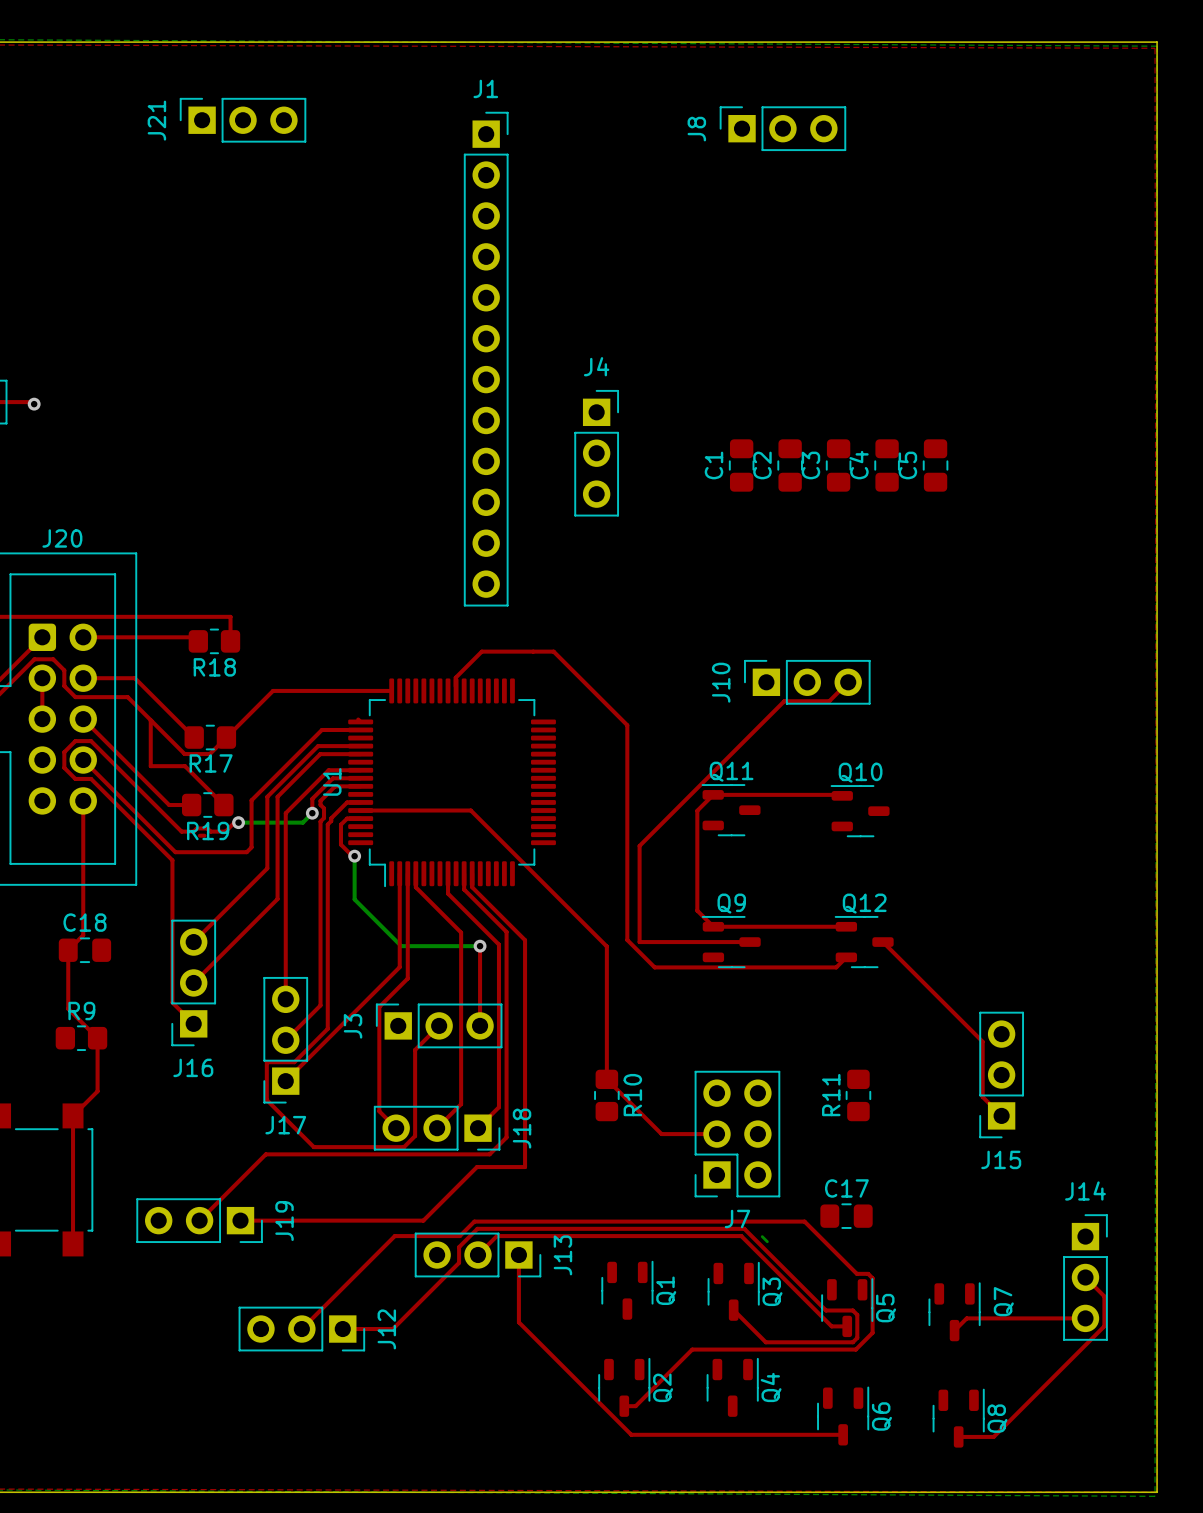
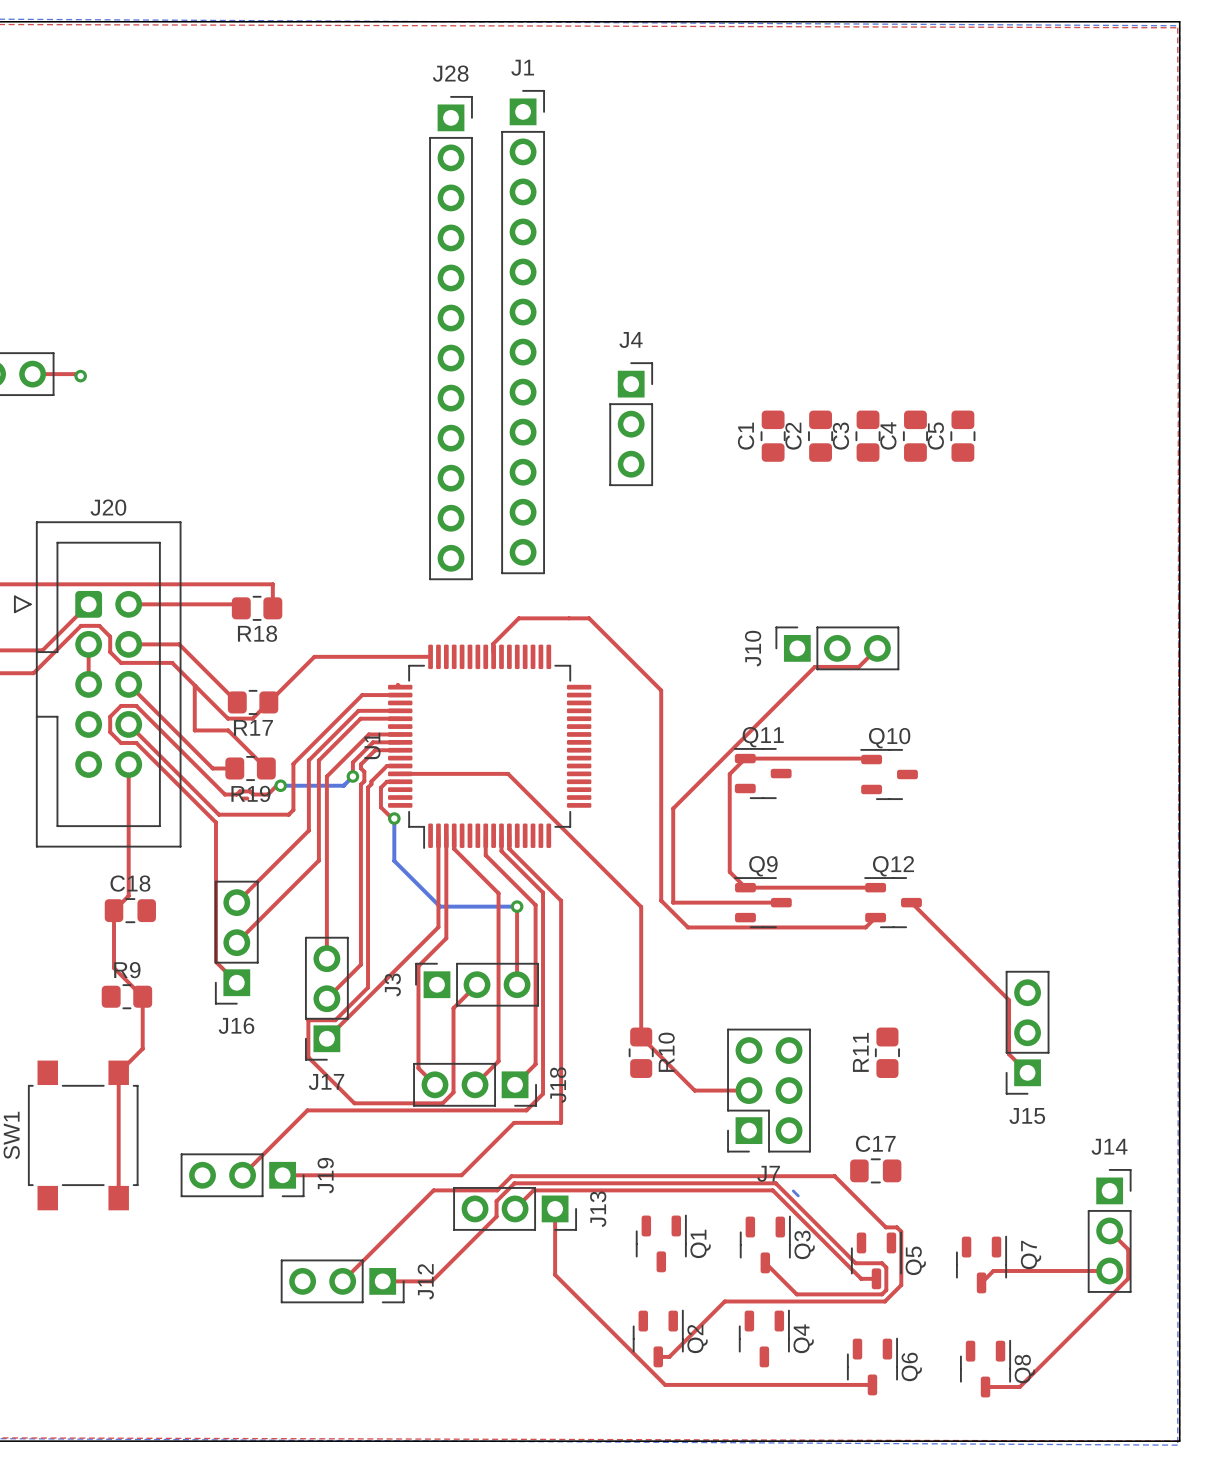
J21: (243, 120) -> none
J8: (782, 128) -> none
J28: none -> (451, 338)

